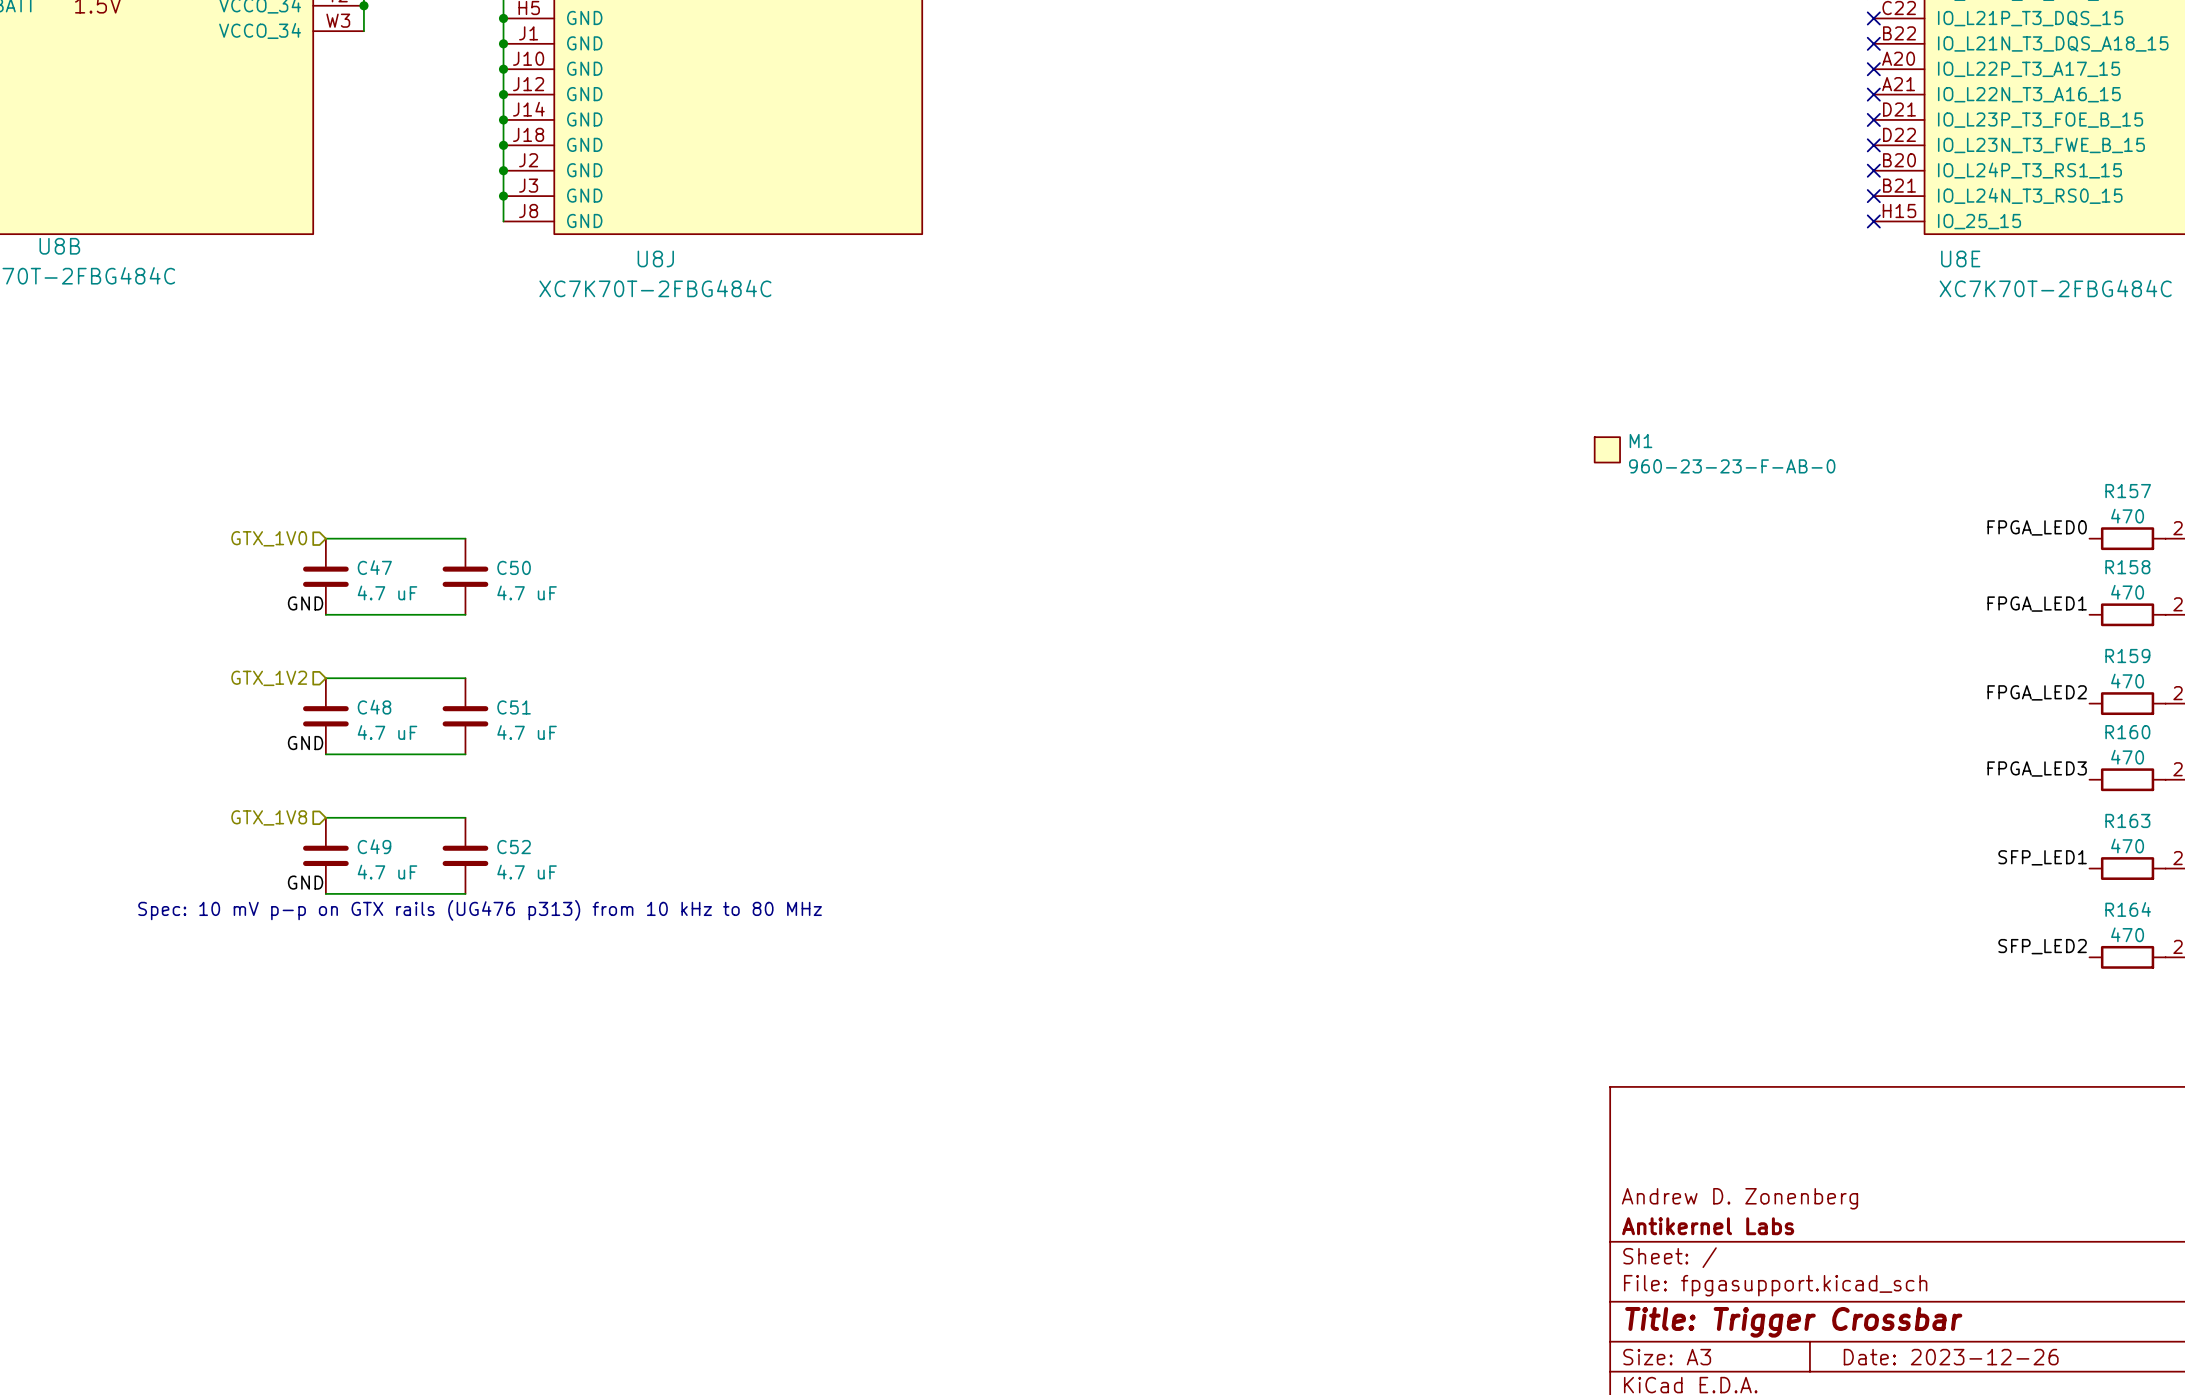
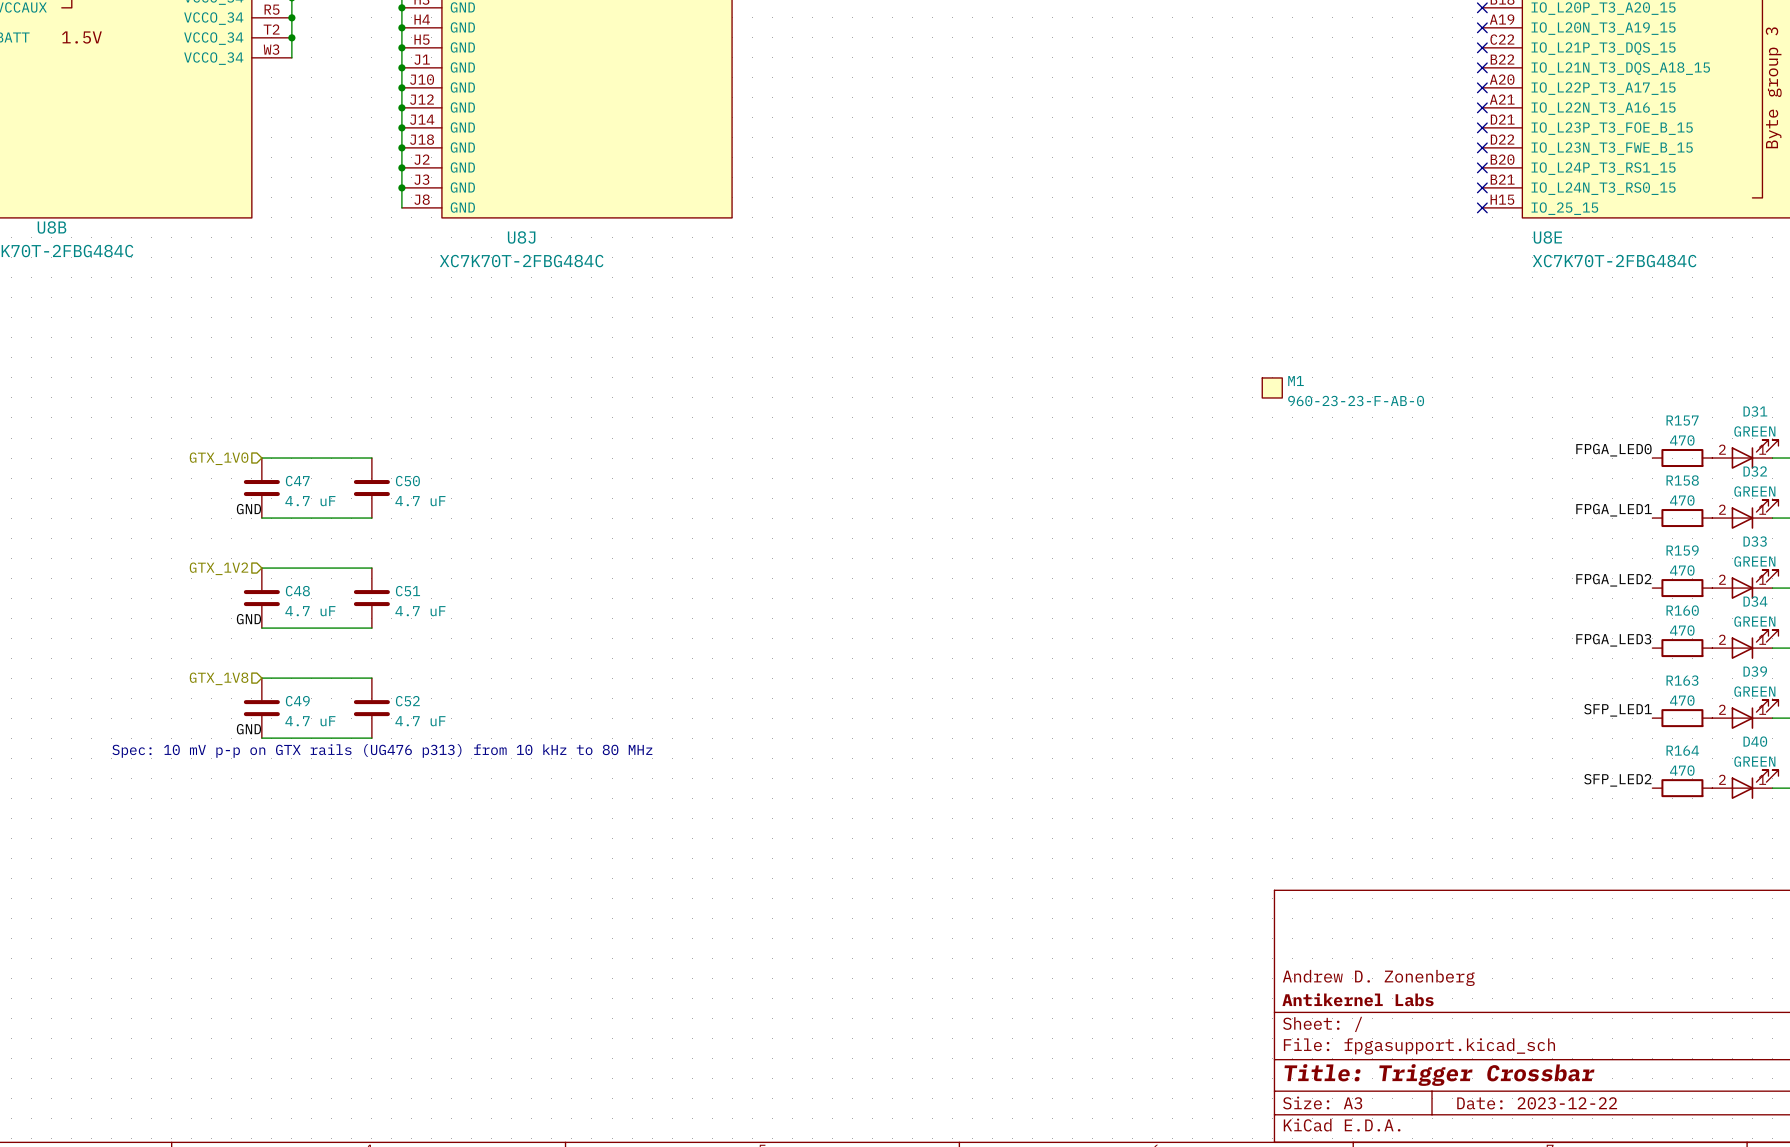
title block: Date: 2023-12-26 (1951, 1357) -> Date: 2023-12-22 (1537, 1103)

